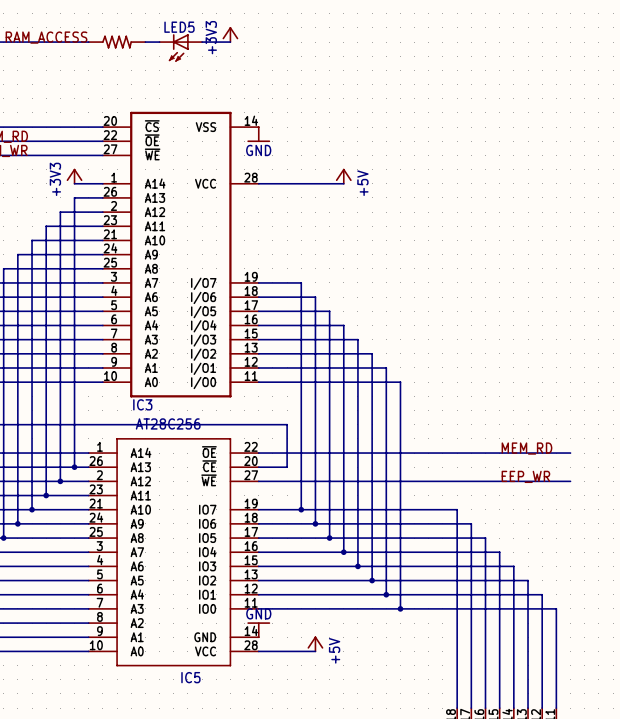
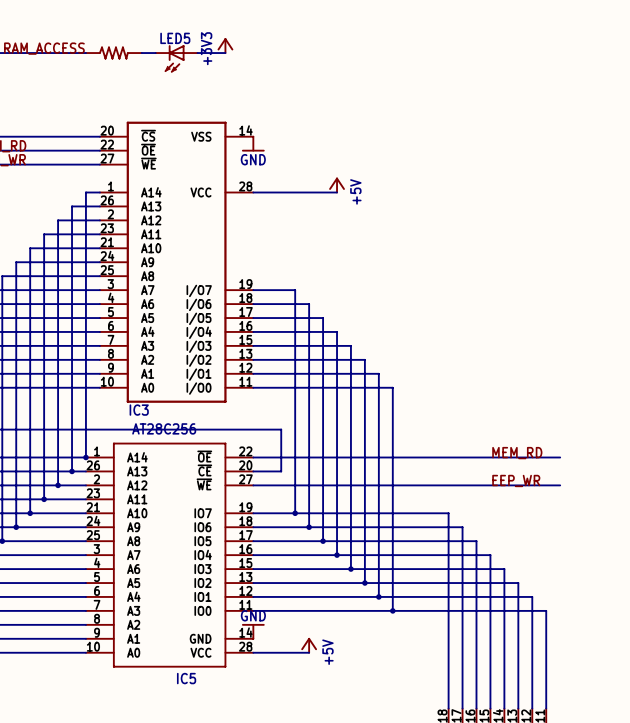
power symbol: +3V3 (74, 176) -> none
wire: (74, 183) (88, 183) -> (85, 457) (85, 192)
junction: none -> (85, 457)

